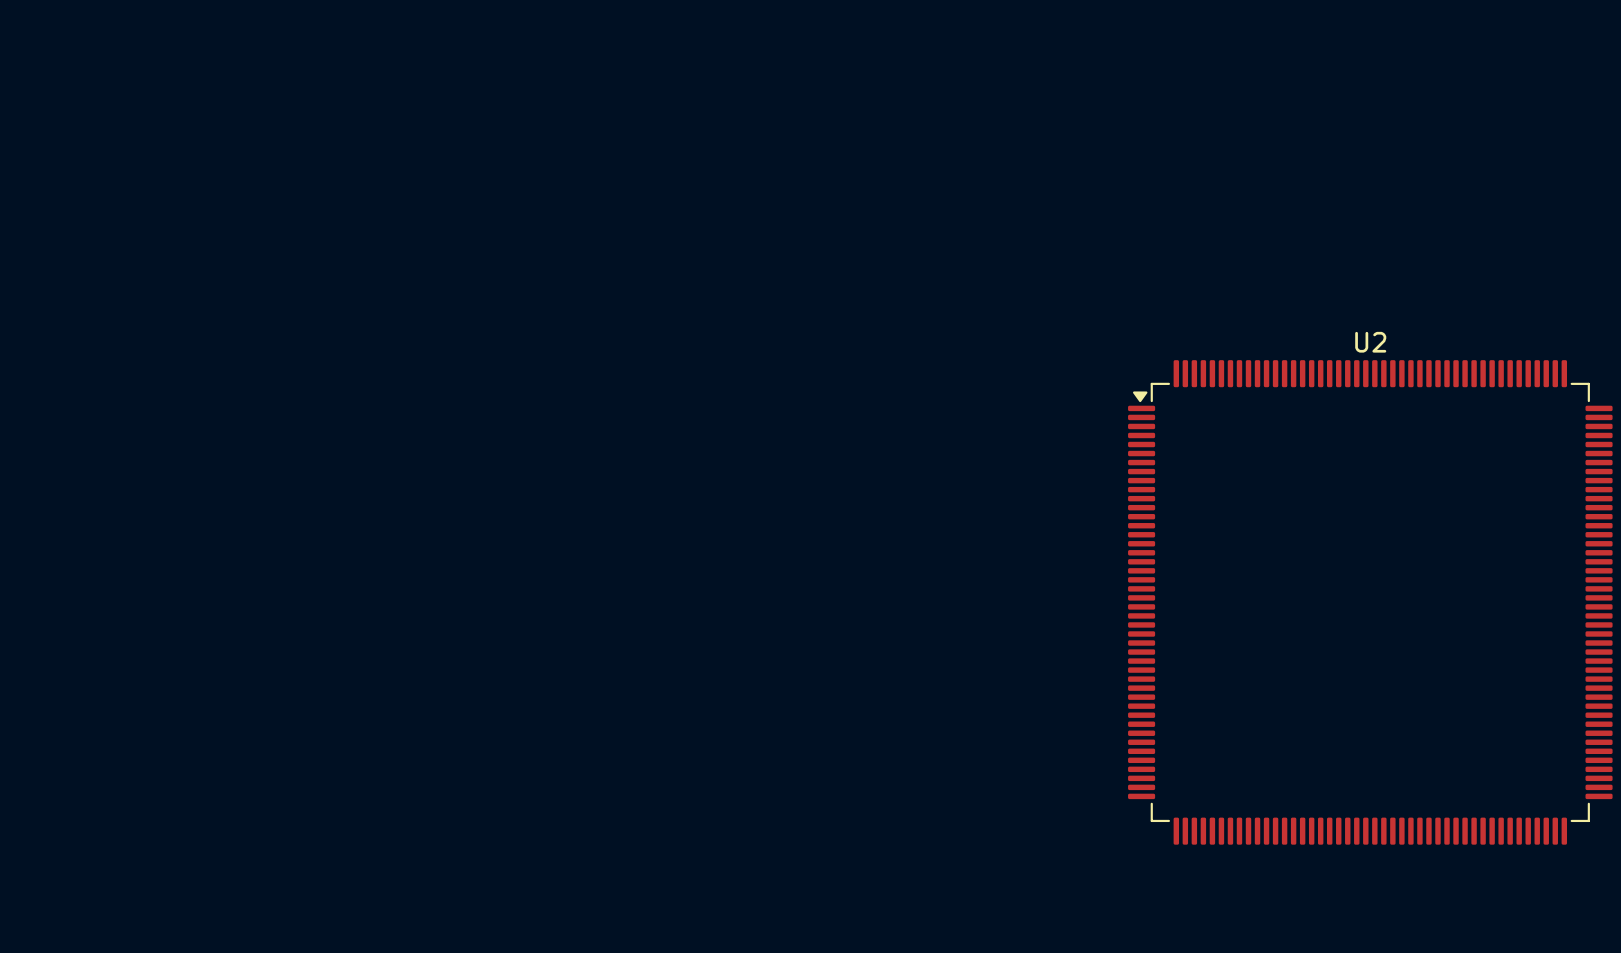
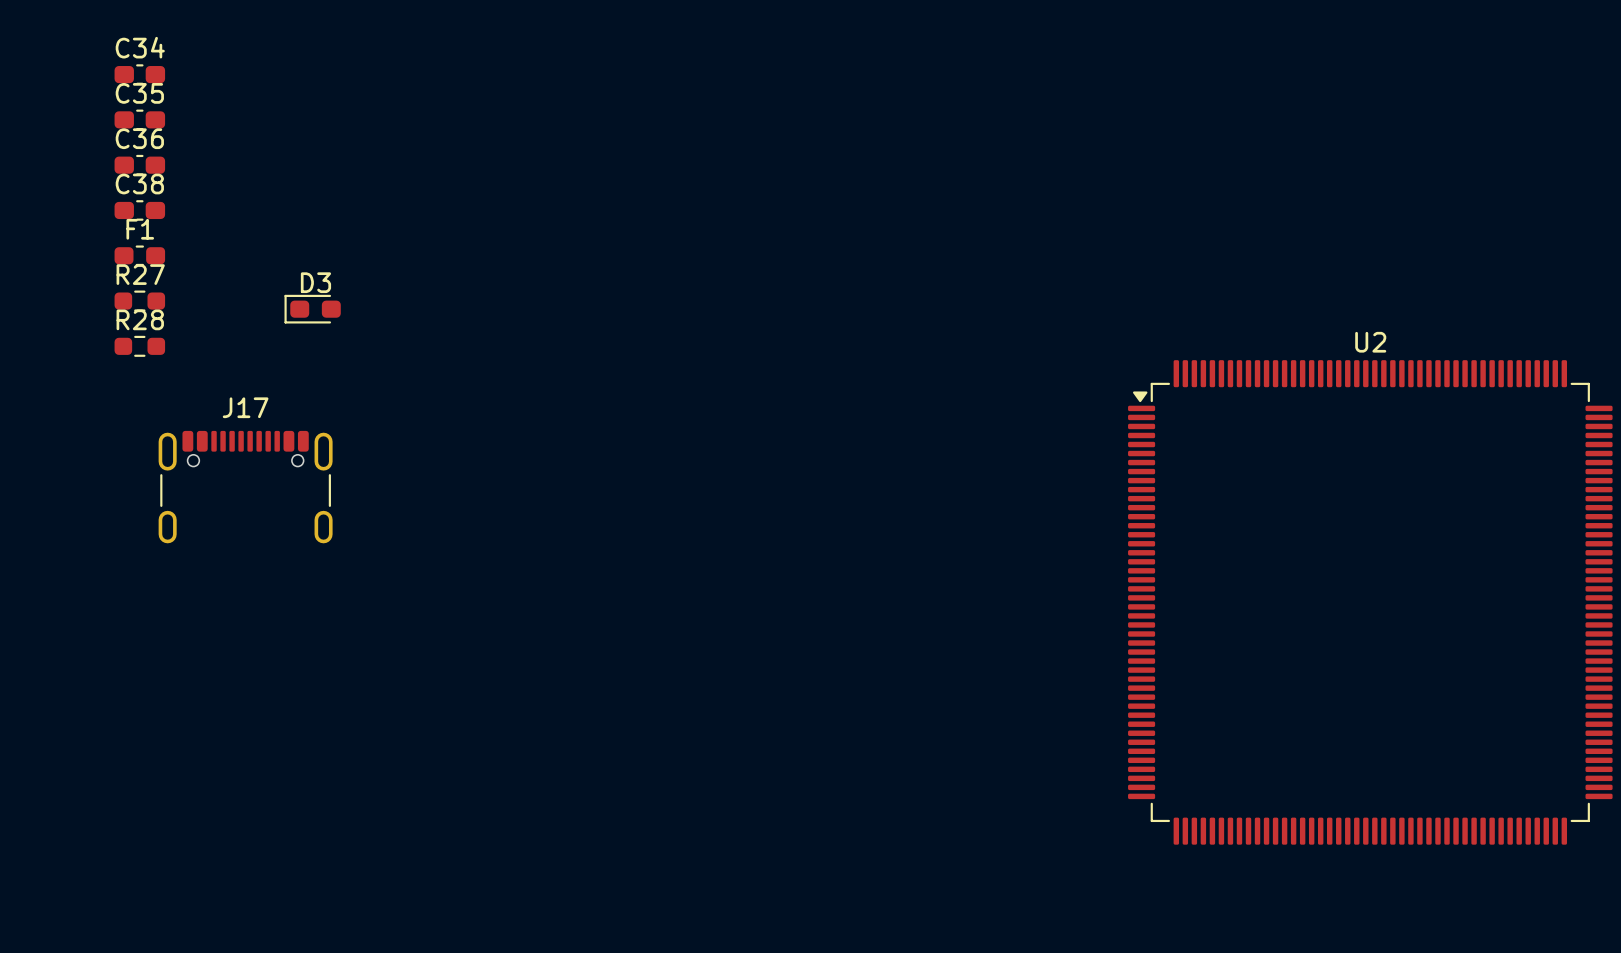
C34: none -> (139, 74)
C35: none -> (139, 119)
C36: none -> (139, 165)
C38: none -> (139, 210)
F1: none -> (139, 255)
R27: none -> (139, 301)
D3: none -> (312, 309)
R28: none -> (139, 346)
J17: none -> (245, 487)

